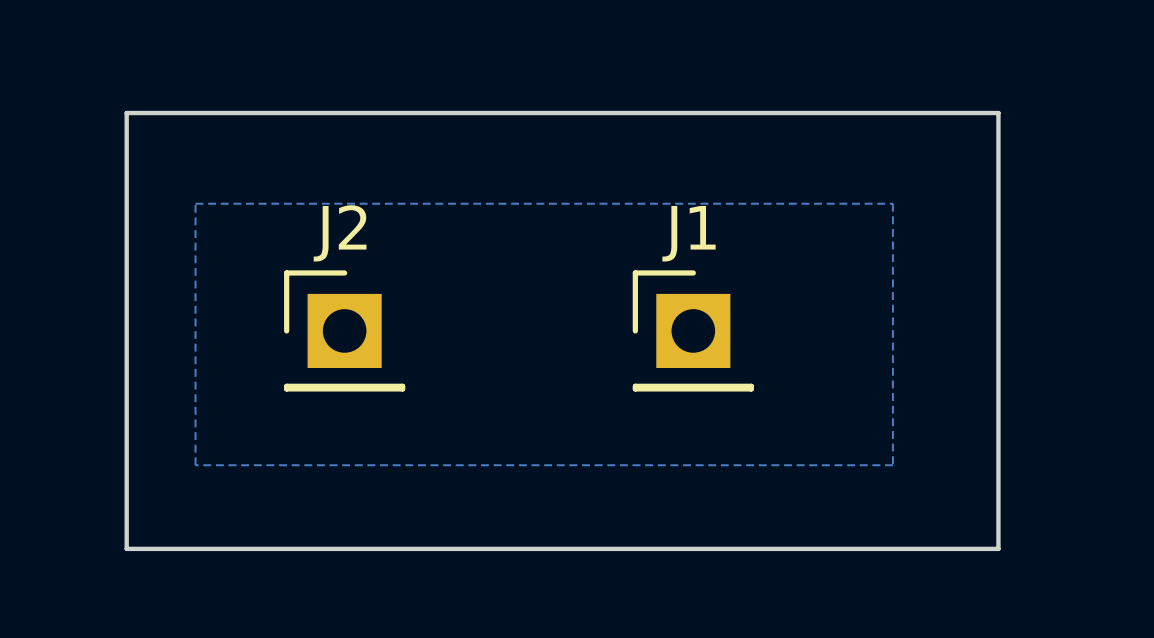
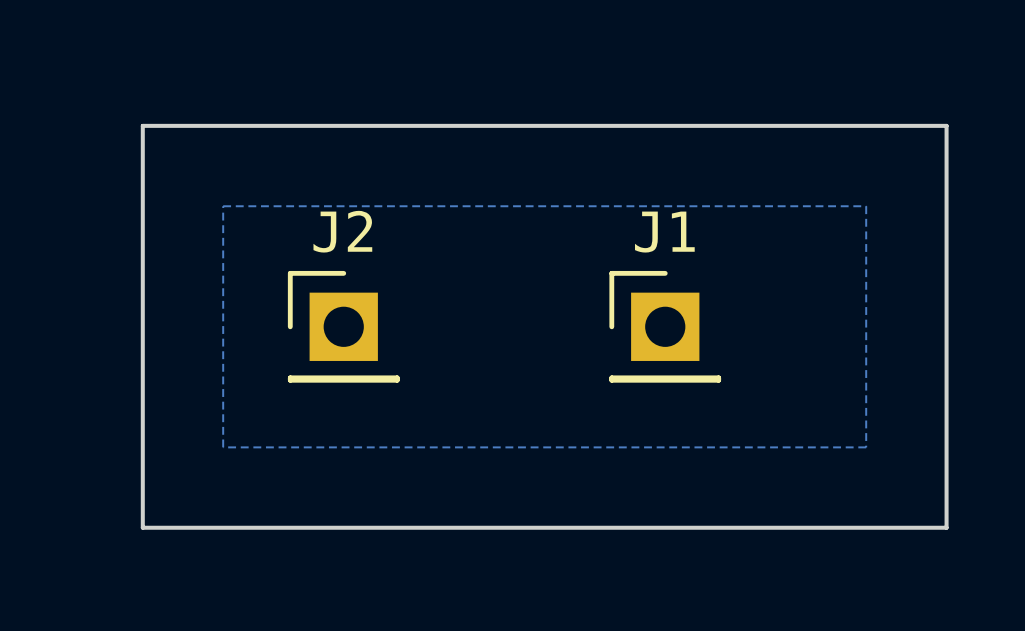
bottom zone outline: (195, 203) (195, 465) (892, 465) (892, 203) (195, 203) -> (223, 206) (223, 447) (866, 447) (866, 206) (223, 206)

